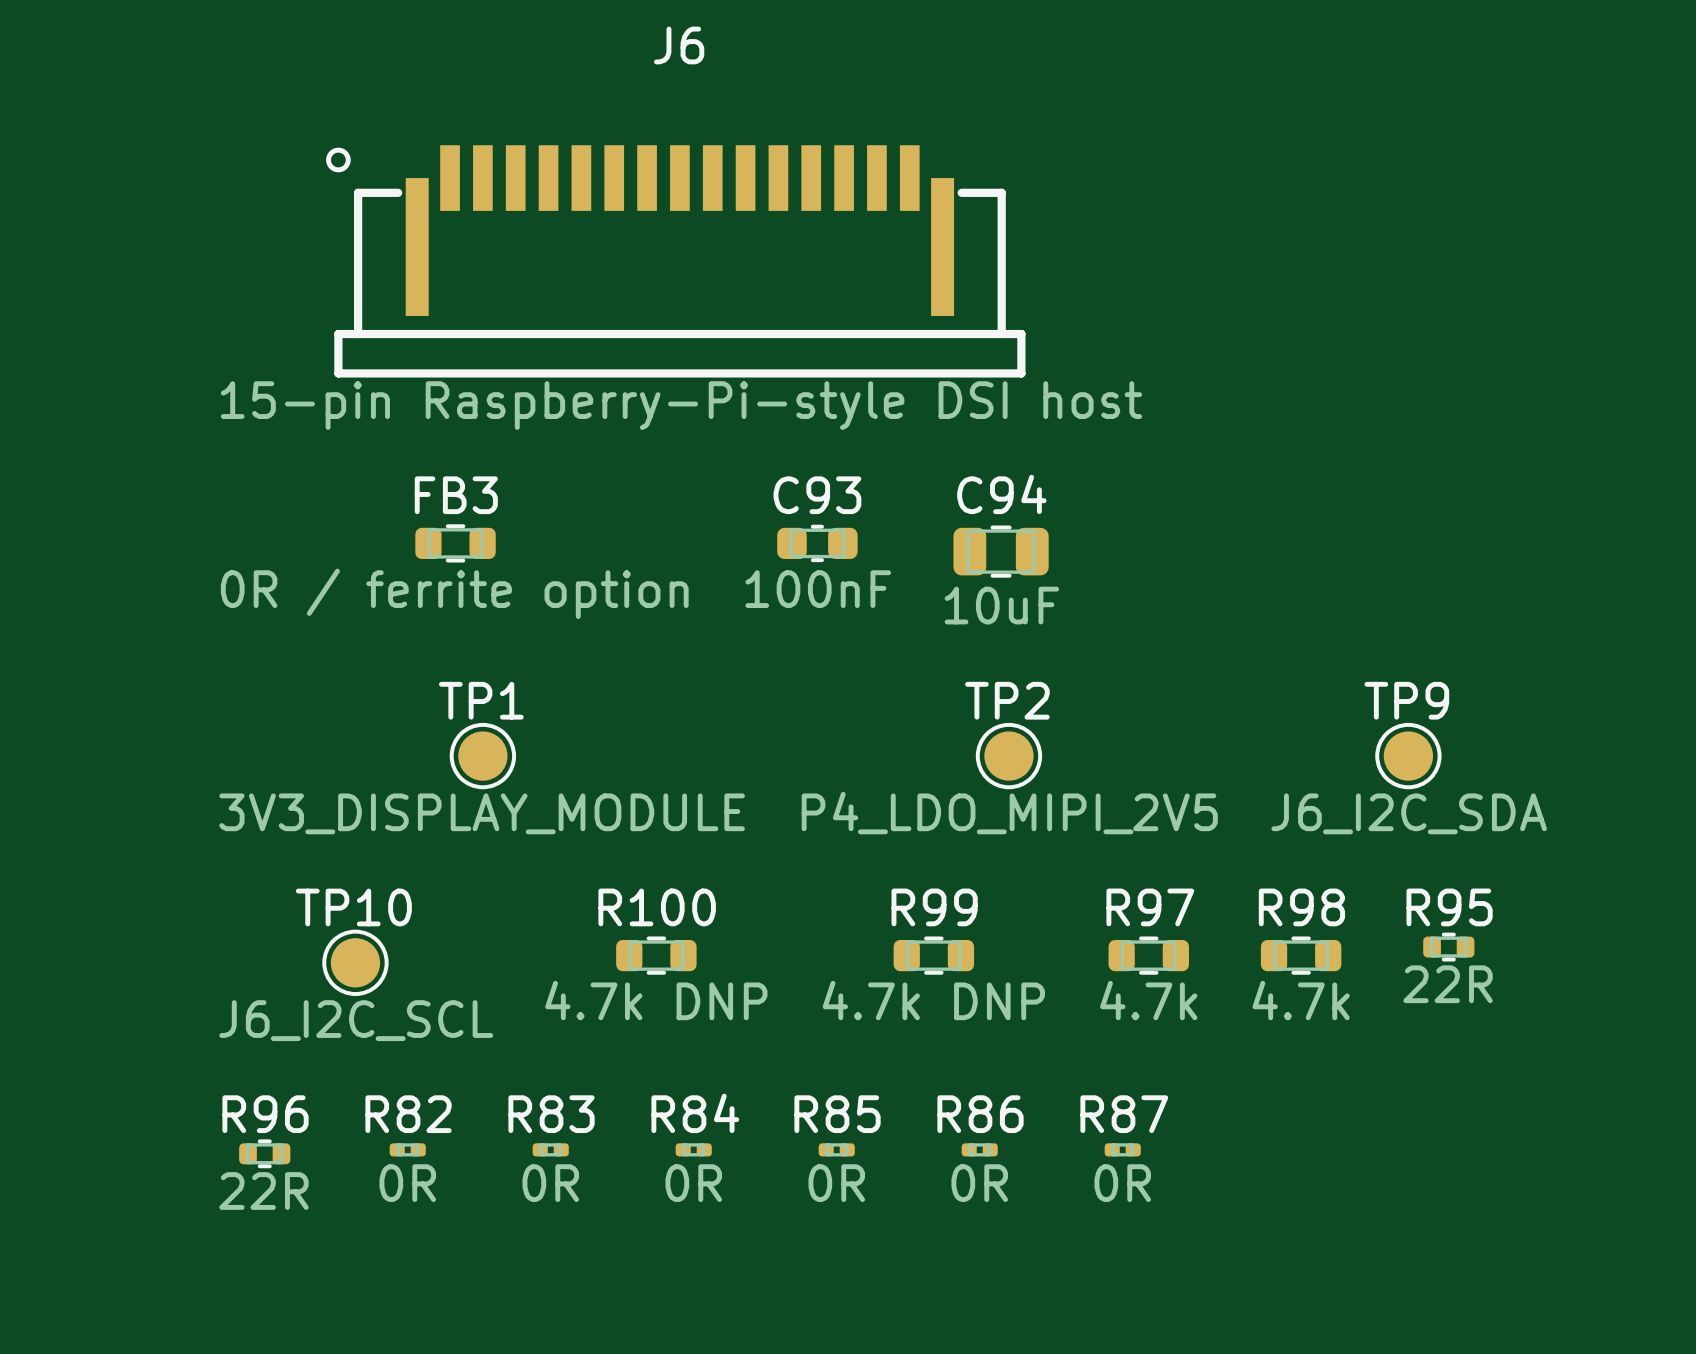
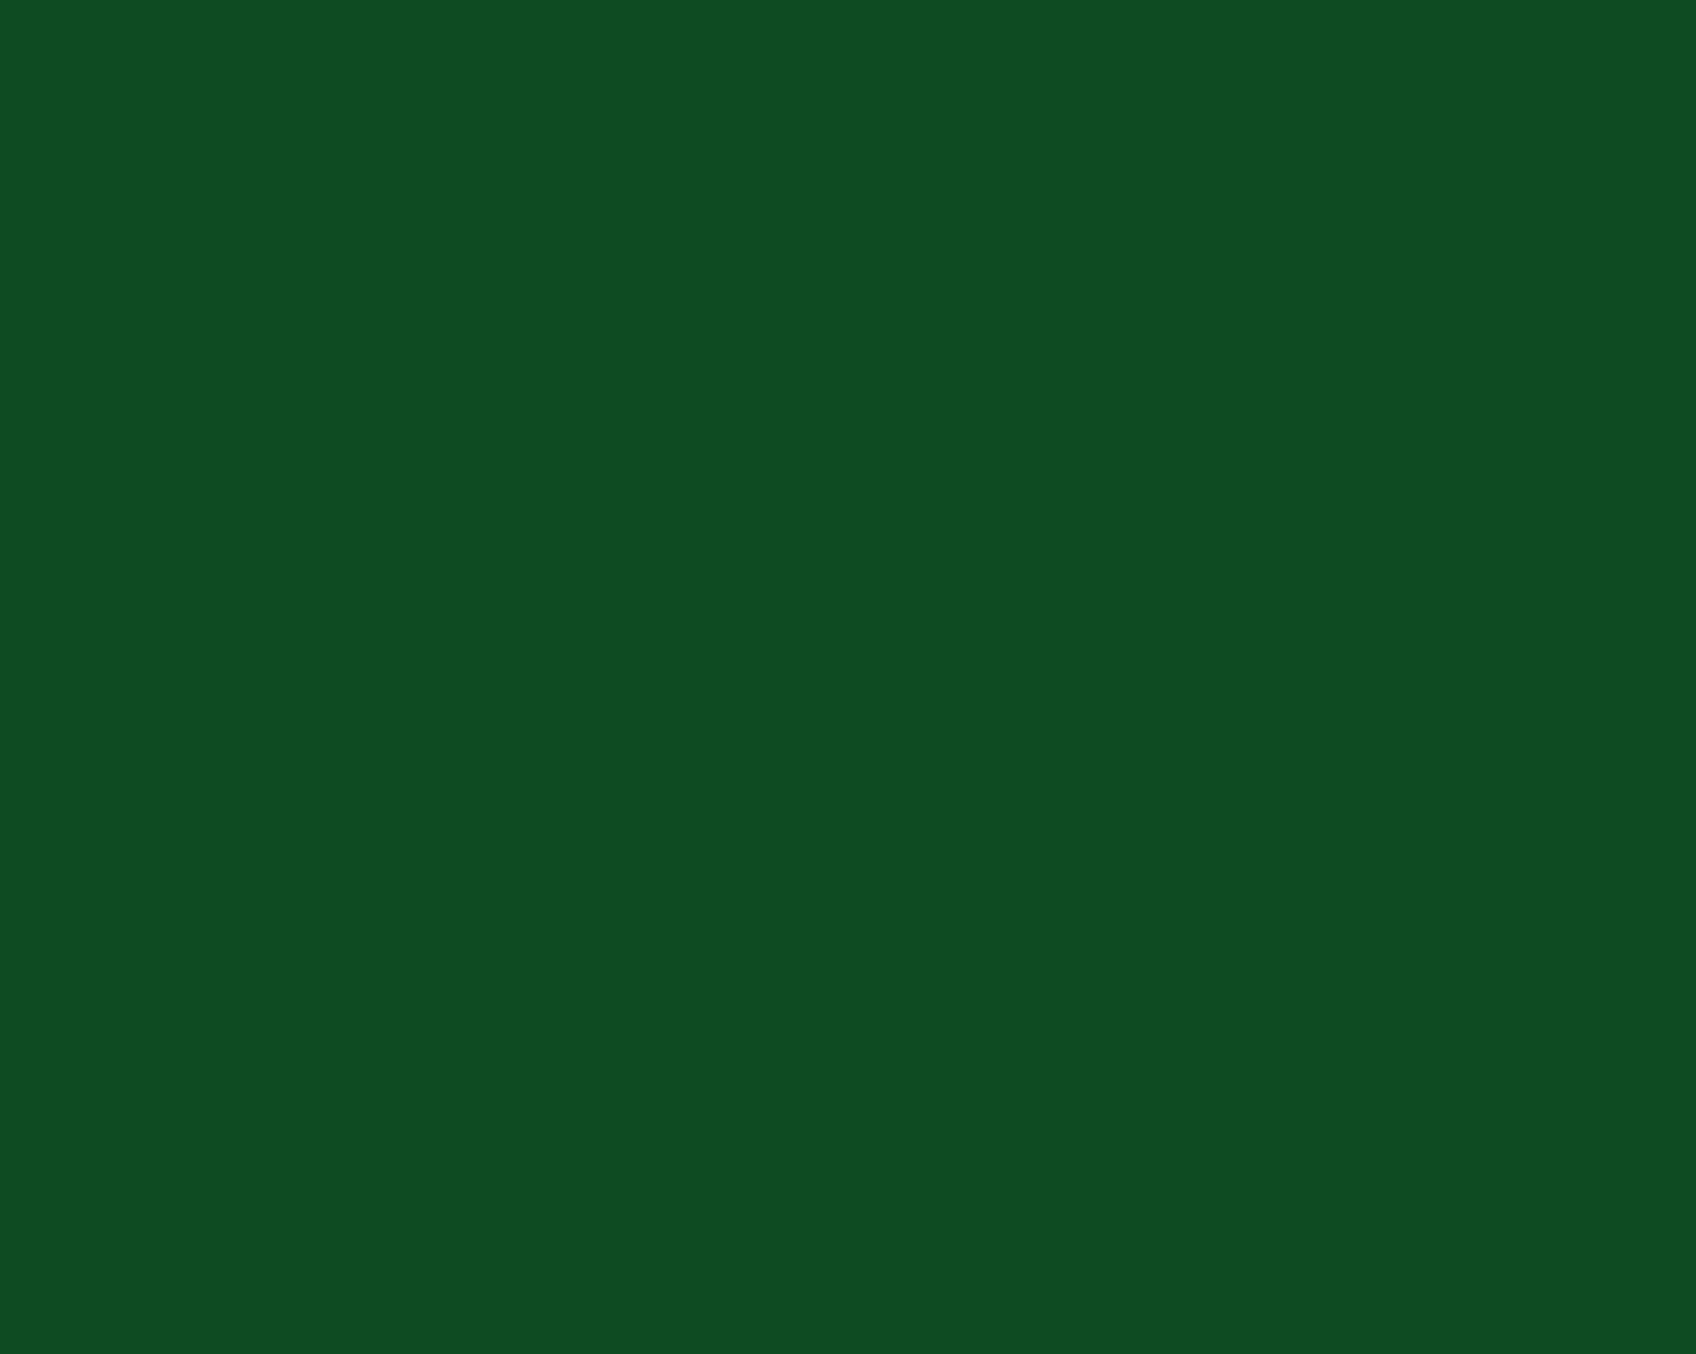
J6: 15-pin Raspberry-Pi-style DSI host (675, 261) -> none
FB3: 0R / ferrite option (455, 543) -> none
C93: 100nF (817, 543) -> none
C94: 10uF (1001, 551) -> none
TP1: 3V3_DISPLAY_MODULE (482, 756) -> none
TP2: P4_LDO_MIPI_2V5 (1008, 756) -> none
TP9: J6_I2C_SDA (1408, 756) -> none
R95: 22R (1448, 947) -> none
R100: 4.7k DNP (656, 955) -> none
R99: 4.7k DNP (933, 955) -> none
R97: 4.7k (1148, 955) -> none
R98: 4.7k (1301, 955) -> none
TP10: J6_I2C_SCL (355, 962) -> none
R82: 0R (407, 1149) -> none
R83: 0R (550, 1149) -> none
R84: 0R (693, 1149) -> none
R85: 0R (836, 1149) -> none
R86: 0R (979, 1149) -> none
R87: 0R (1122, 1149) -> none
R96: 22R (264, 1153) -> none

